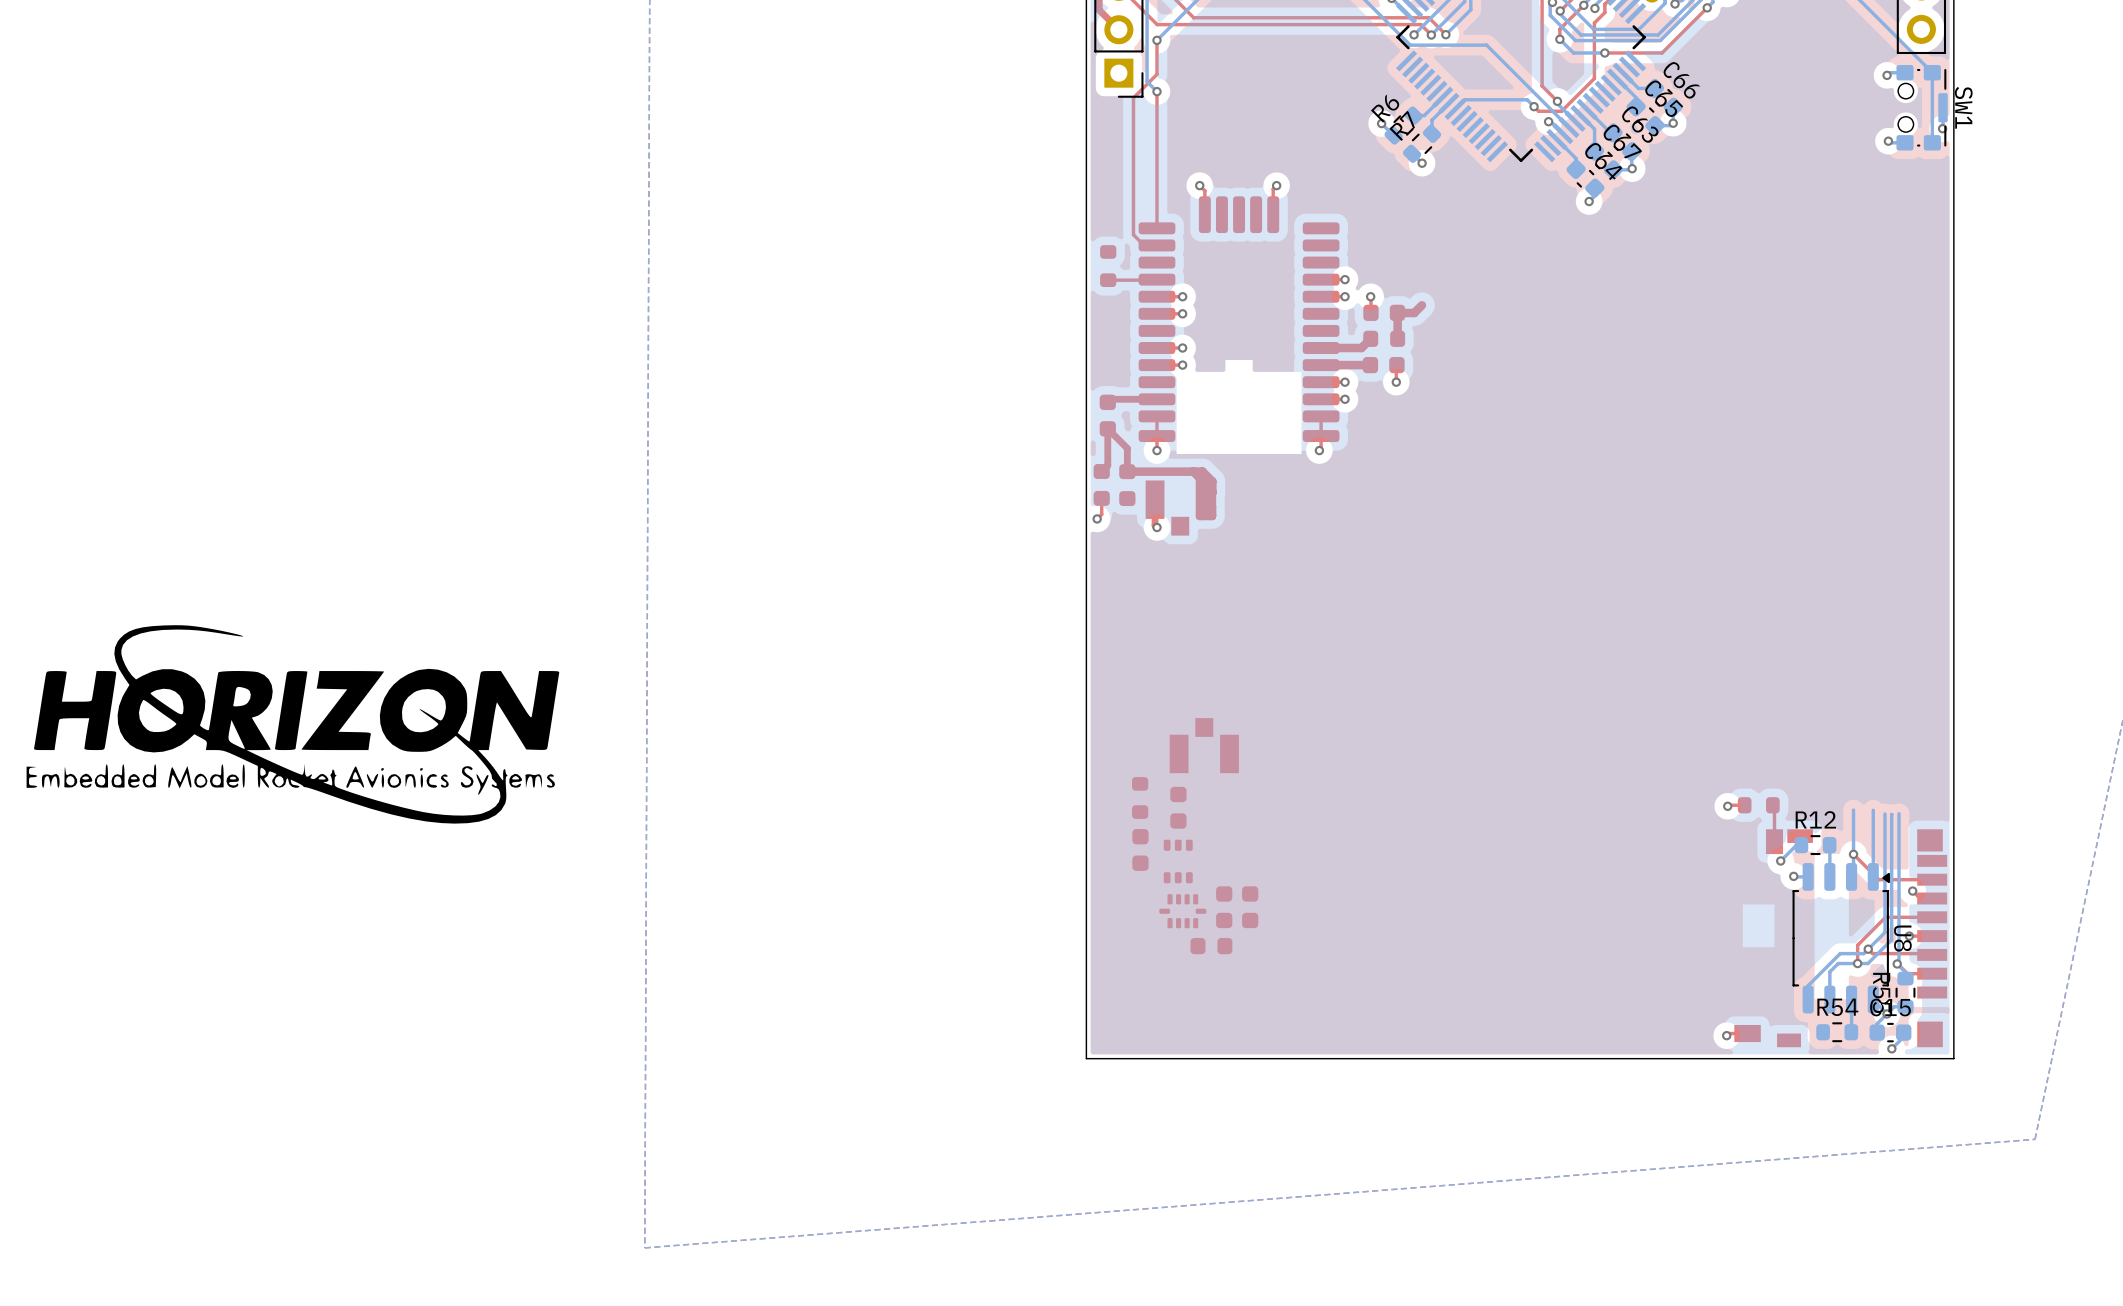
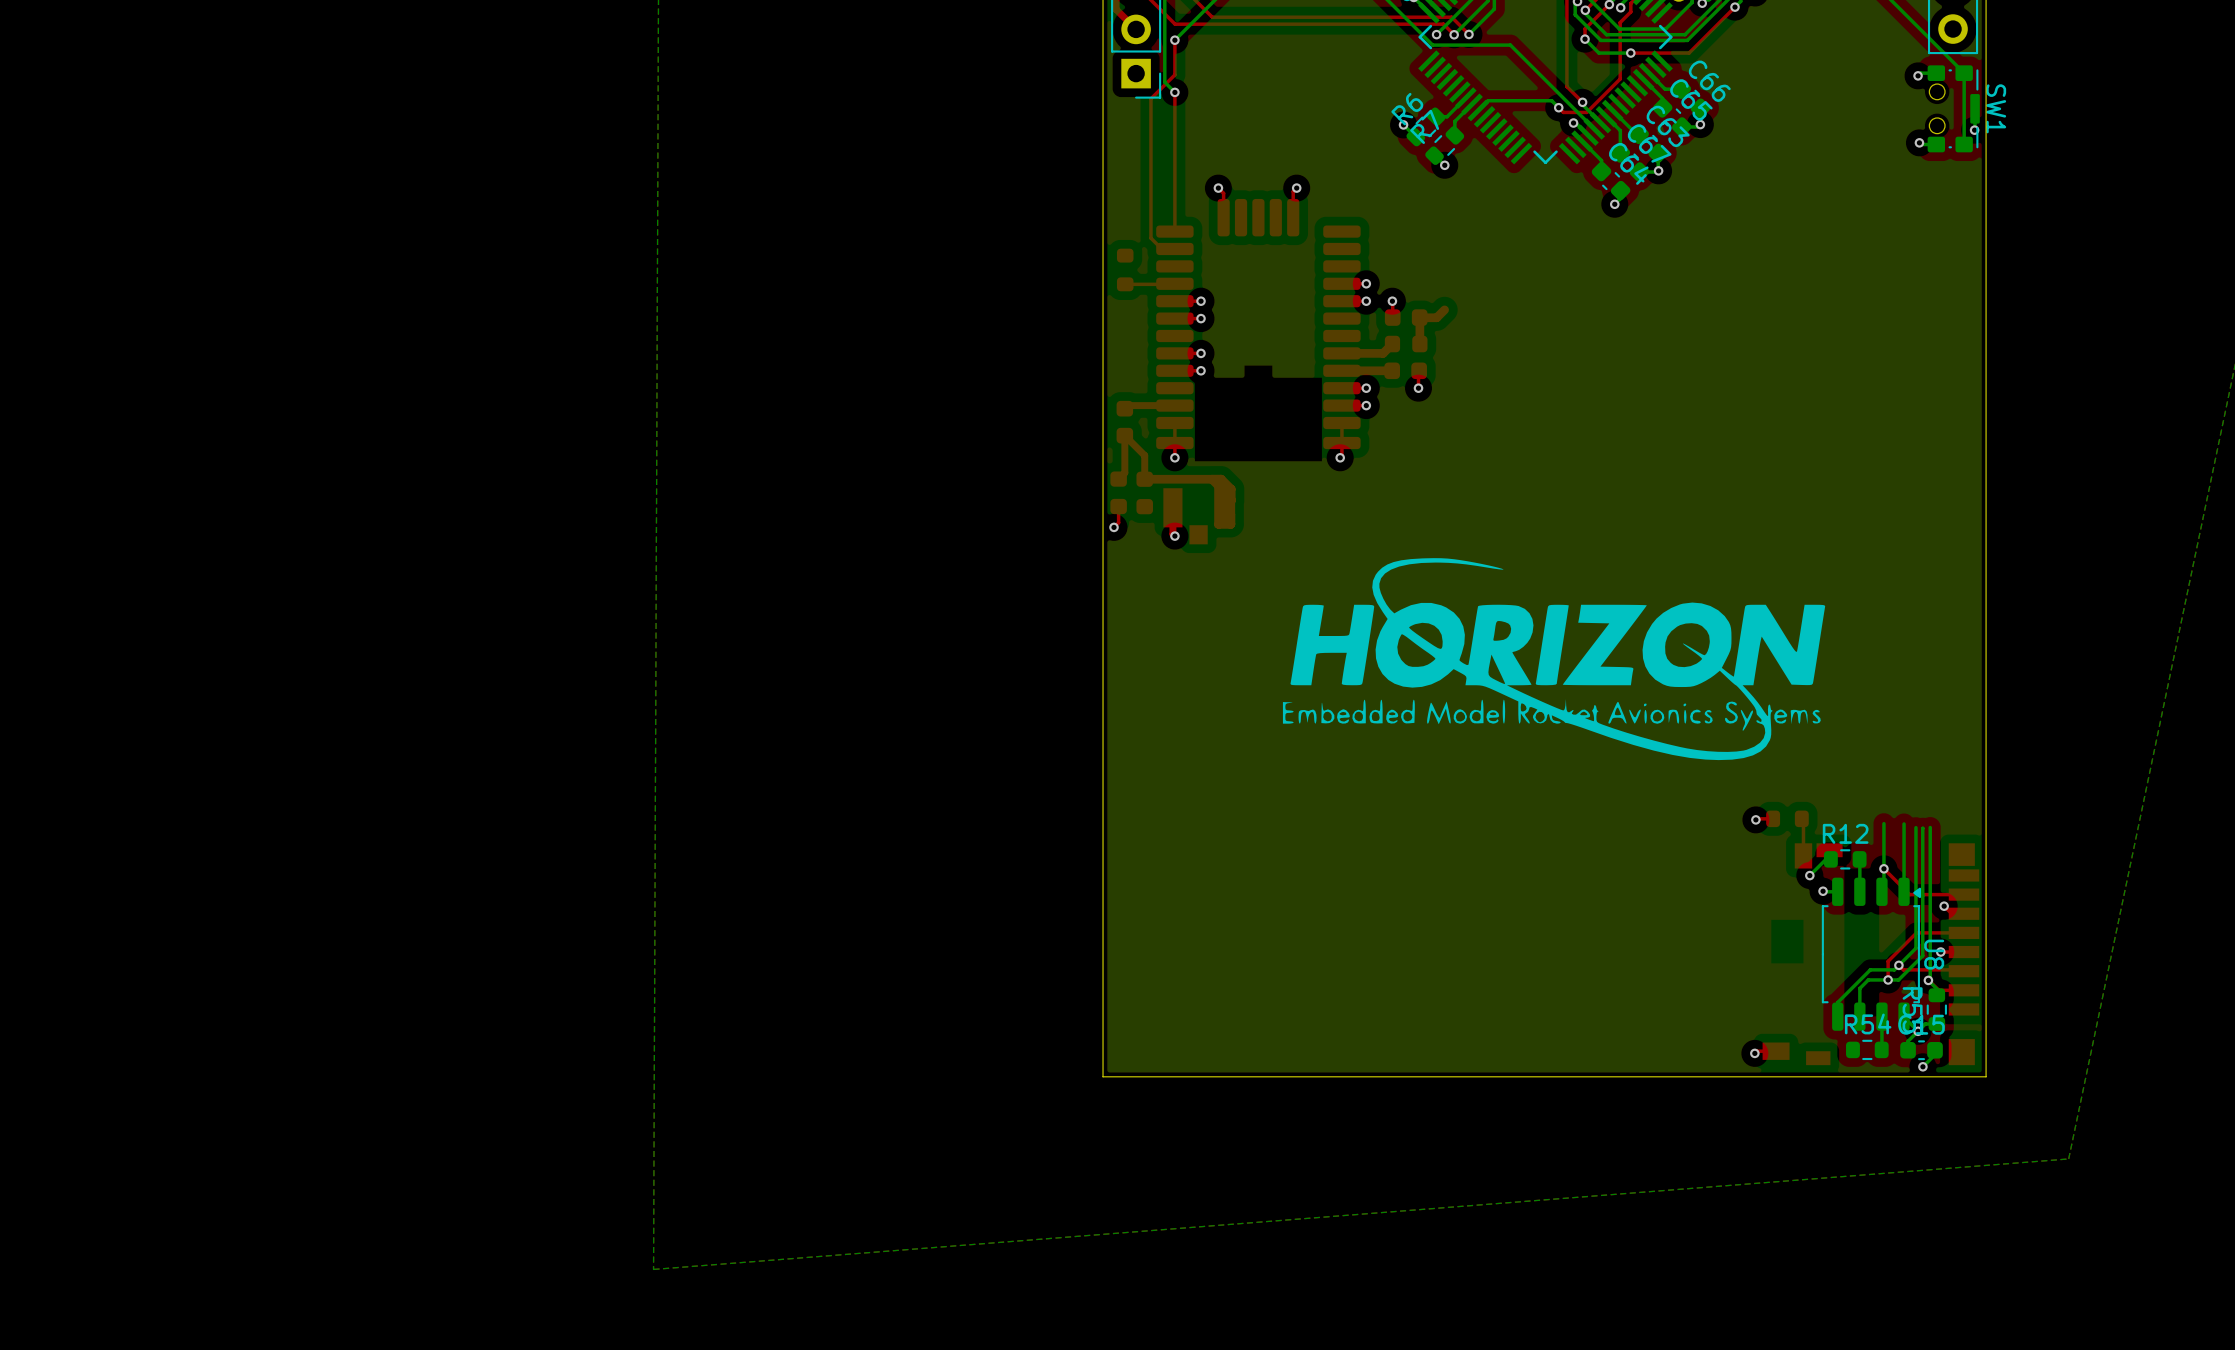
drawing: none -> [1282, 558, 1826, 761]
drawing: [26, 625, 560, 824] -> none
part: (1204, 745) -> none
part: (1140, 797) -> none
part: (1178, 807) -> none
part: (1140, 849) -> none
part: (1178, 861) -> none
part: (1224, 907) -> none
part: (1250, 907) -> none
part: (1182, 911) -> none
part: (1211, 946) -> none

